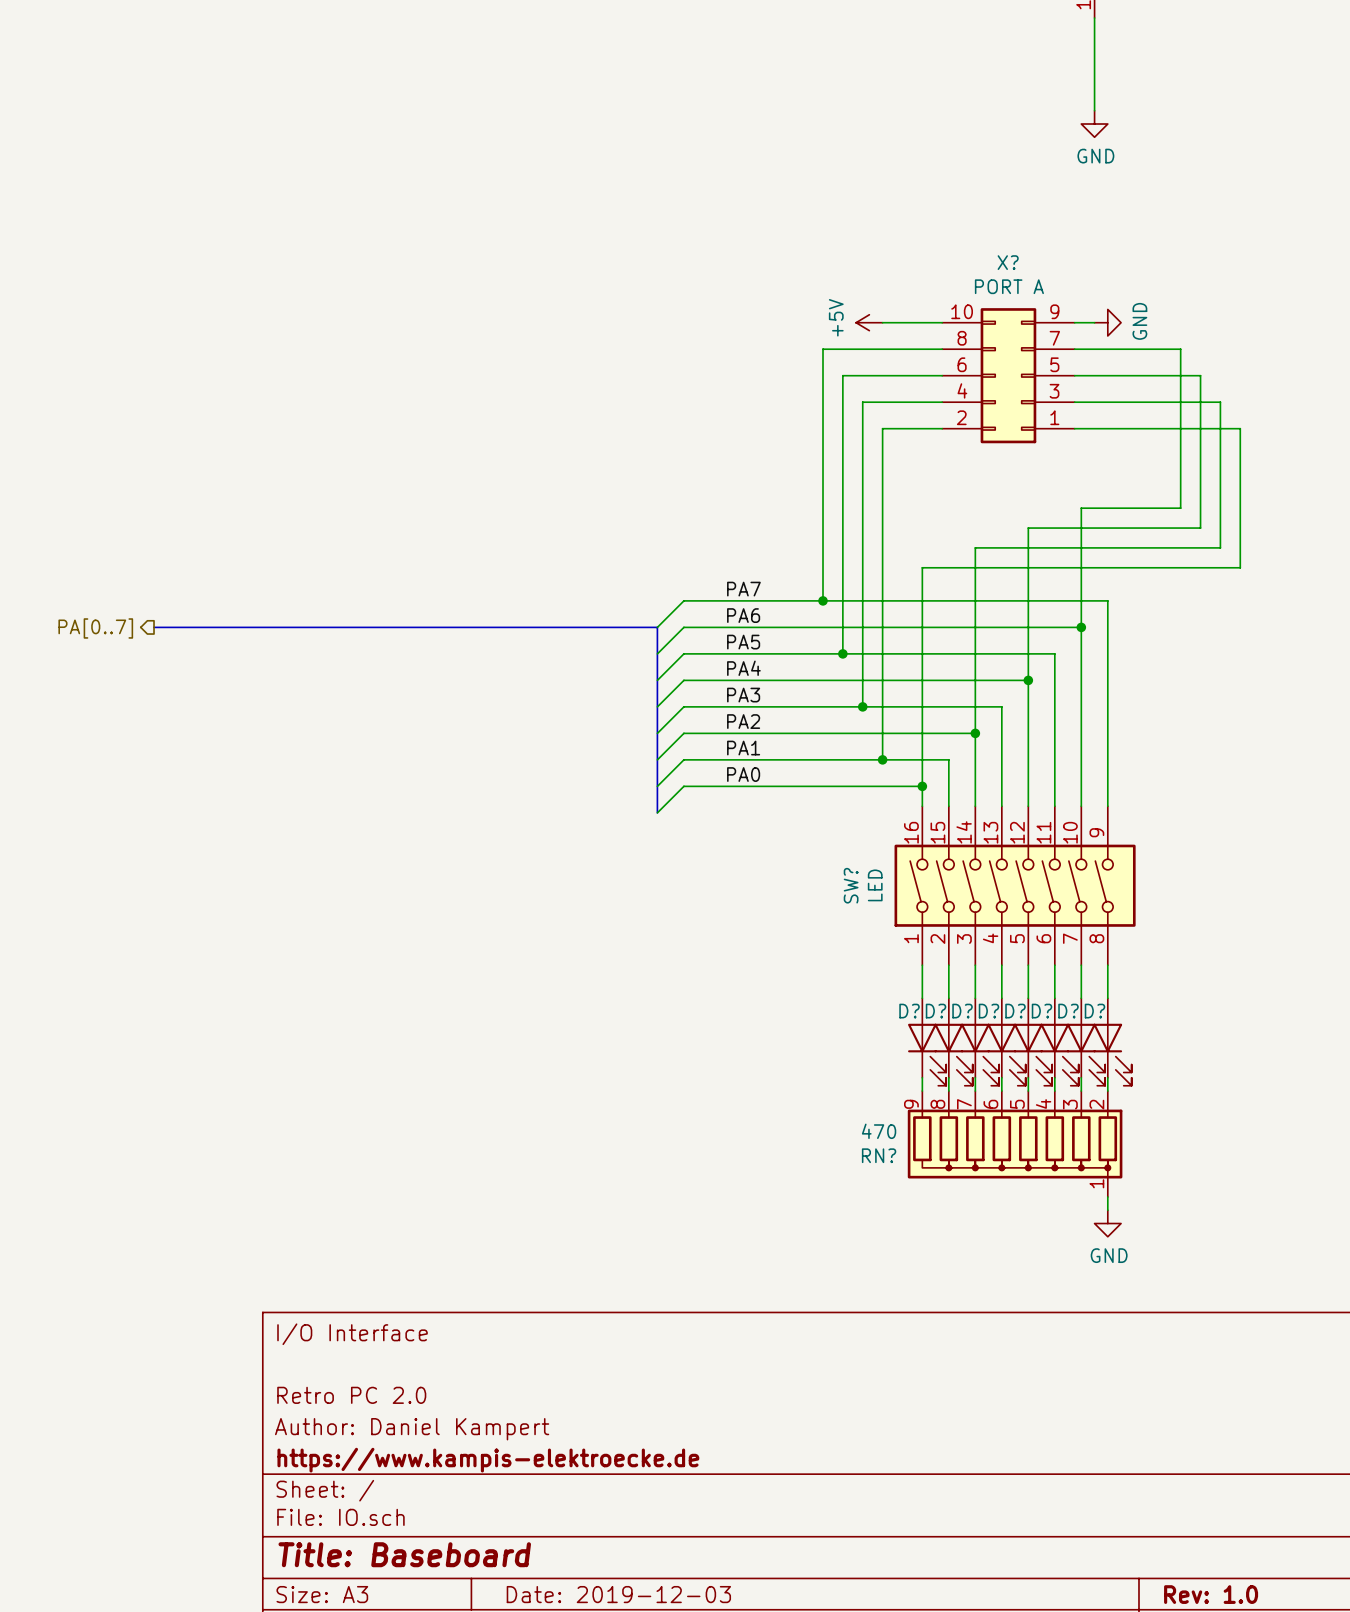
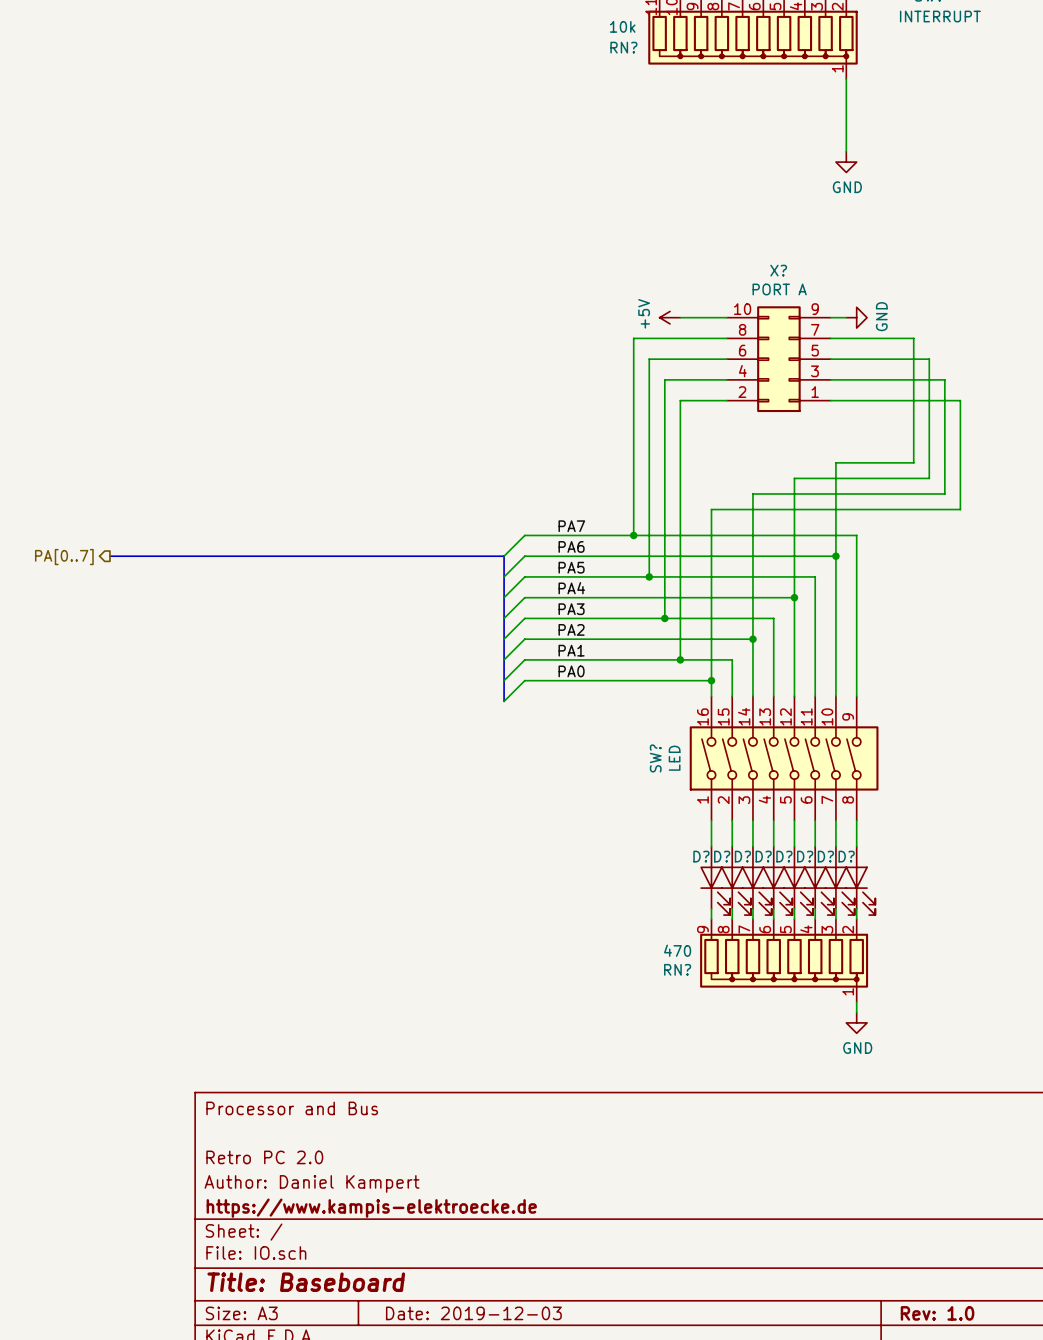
title block: I/O Interface (352, 1334) -> Processor and Bus (292, 1108)

